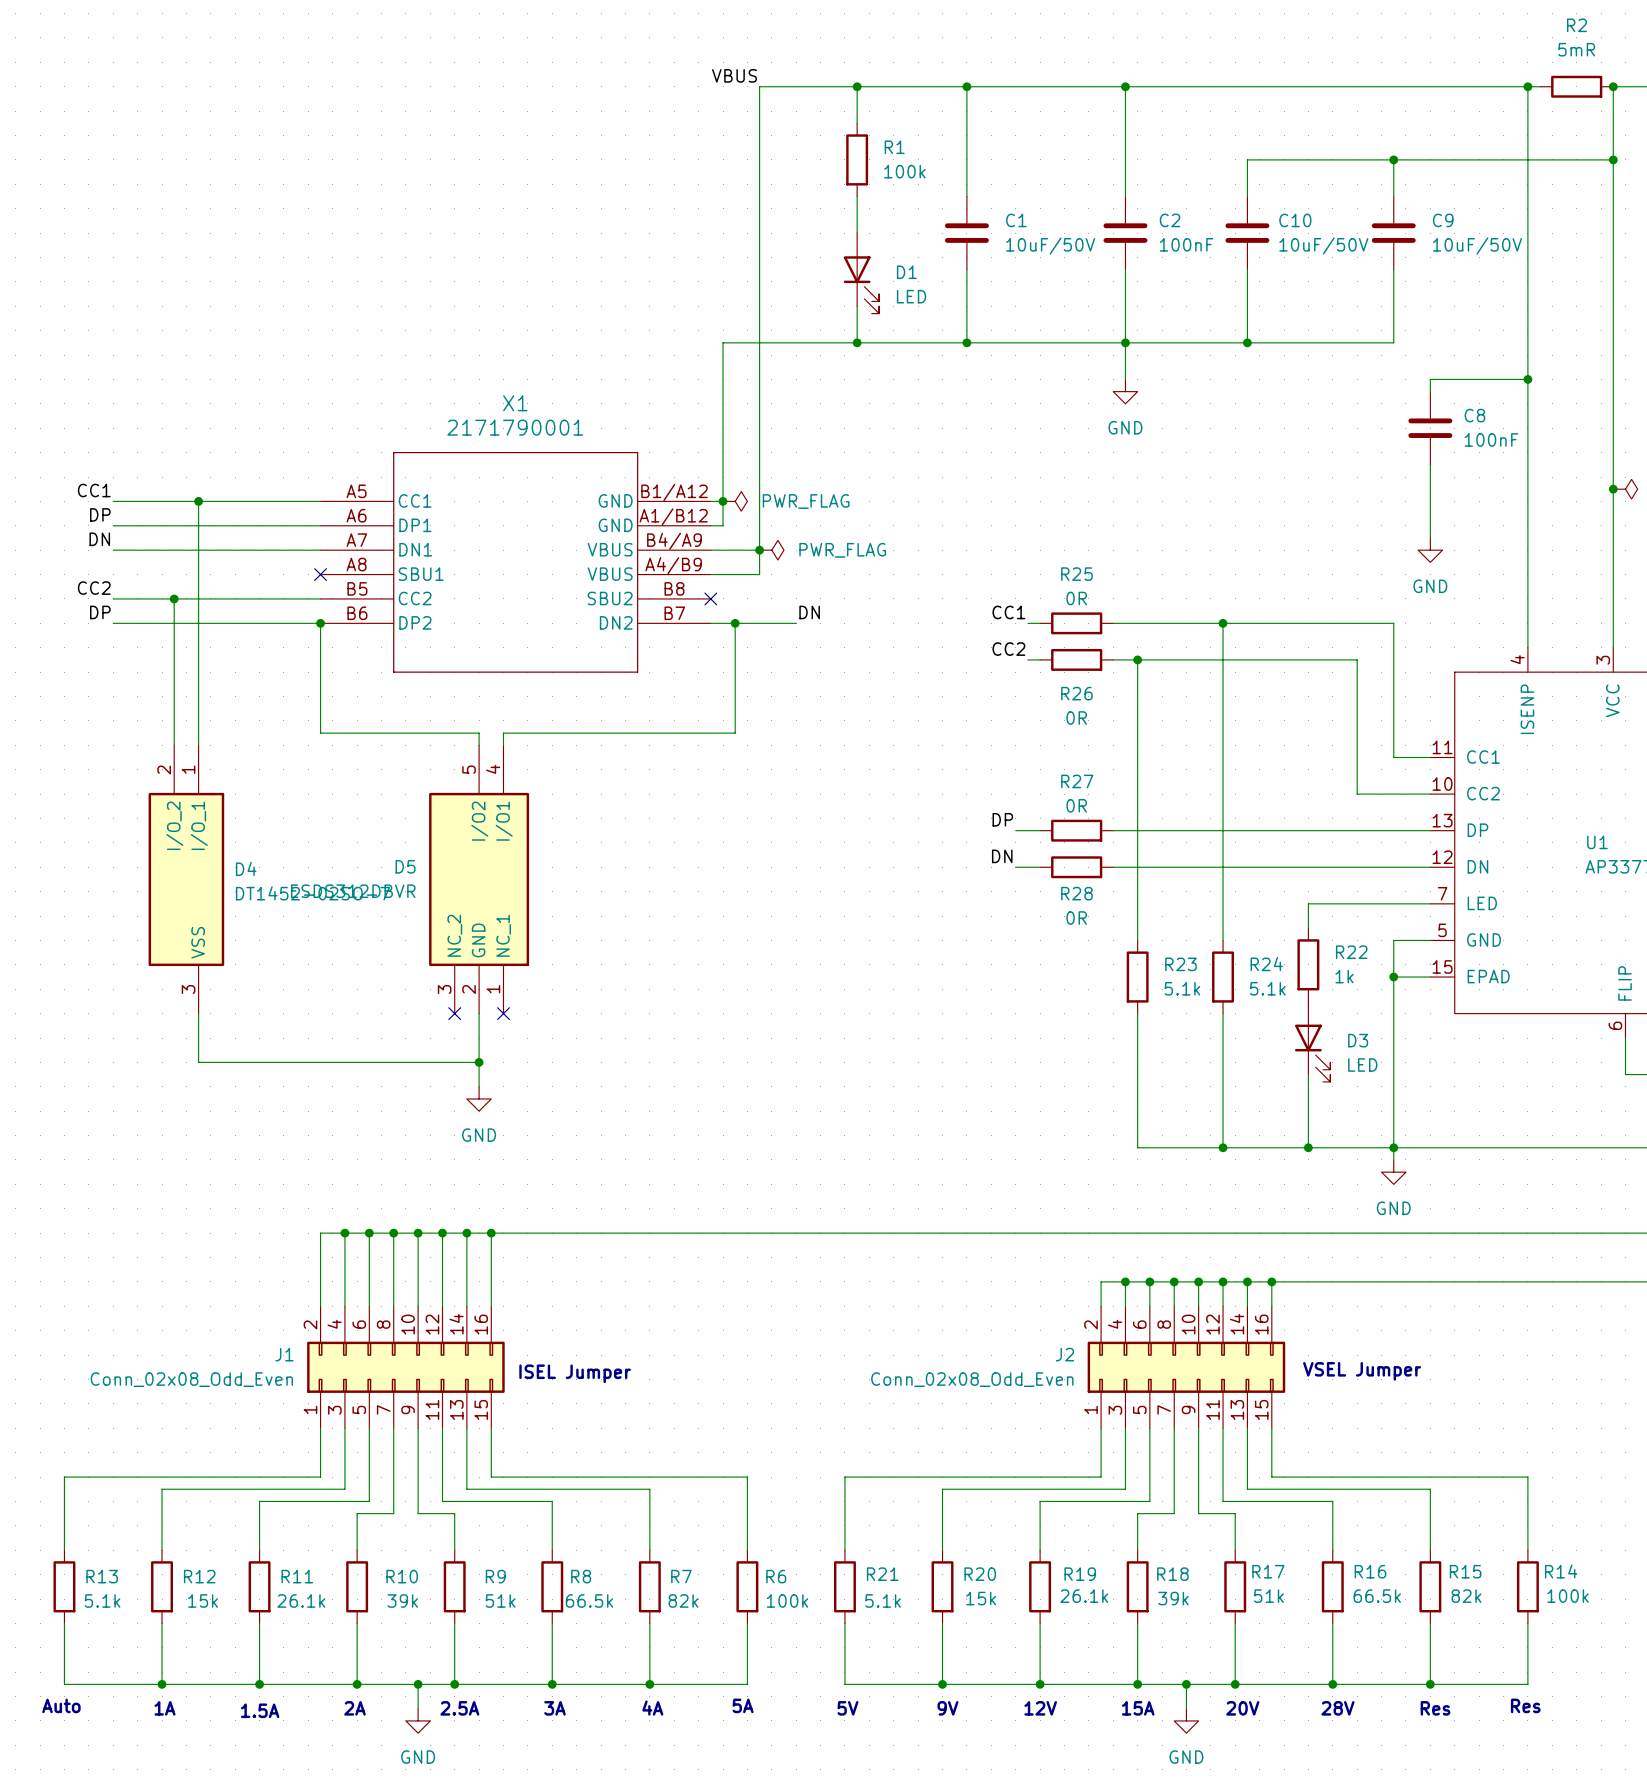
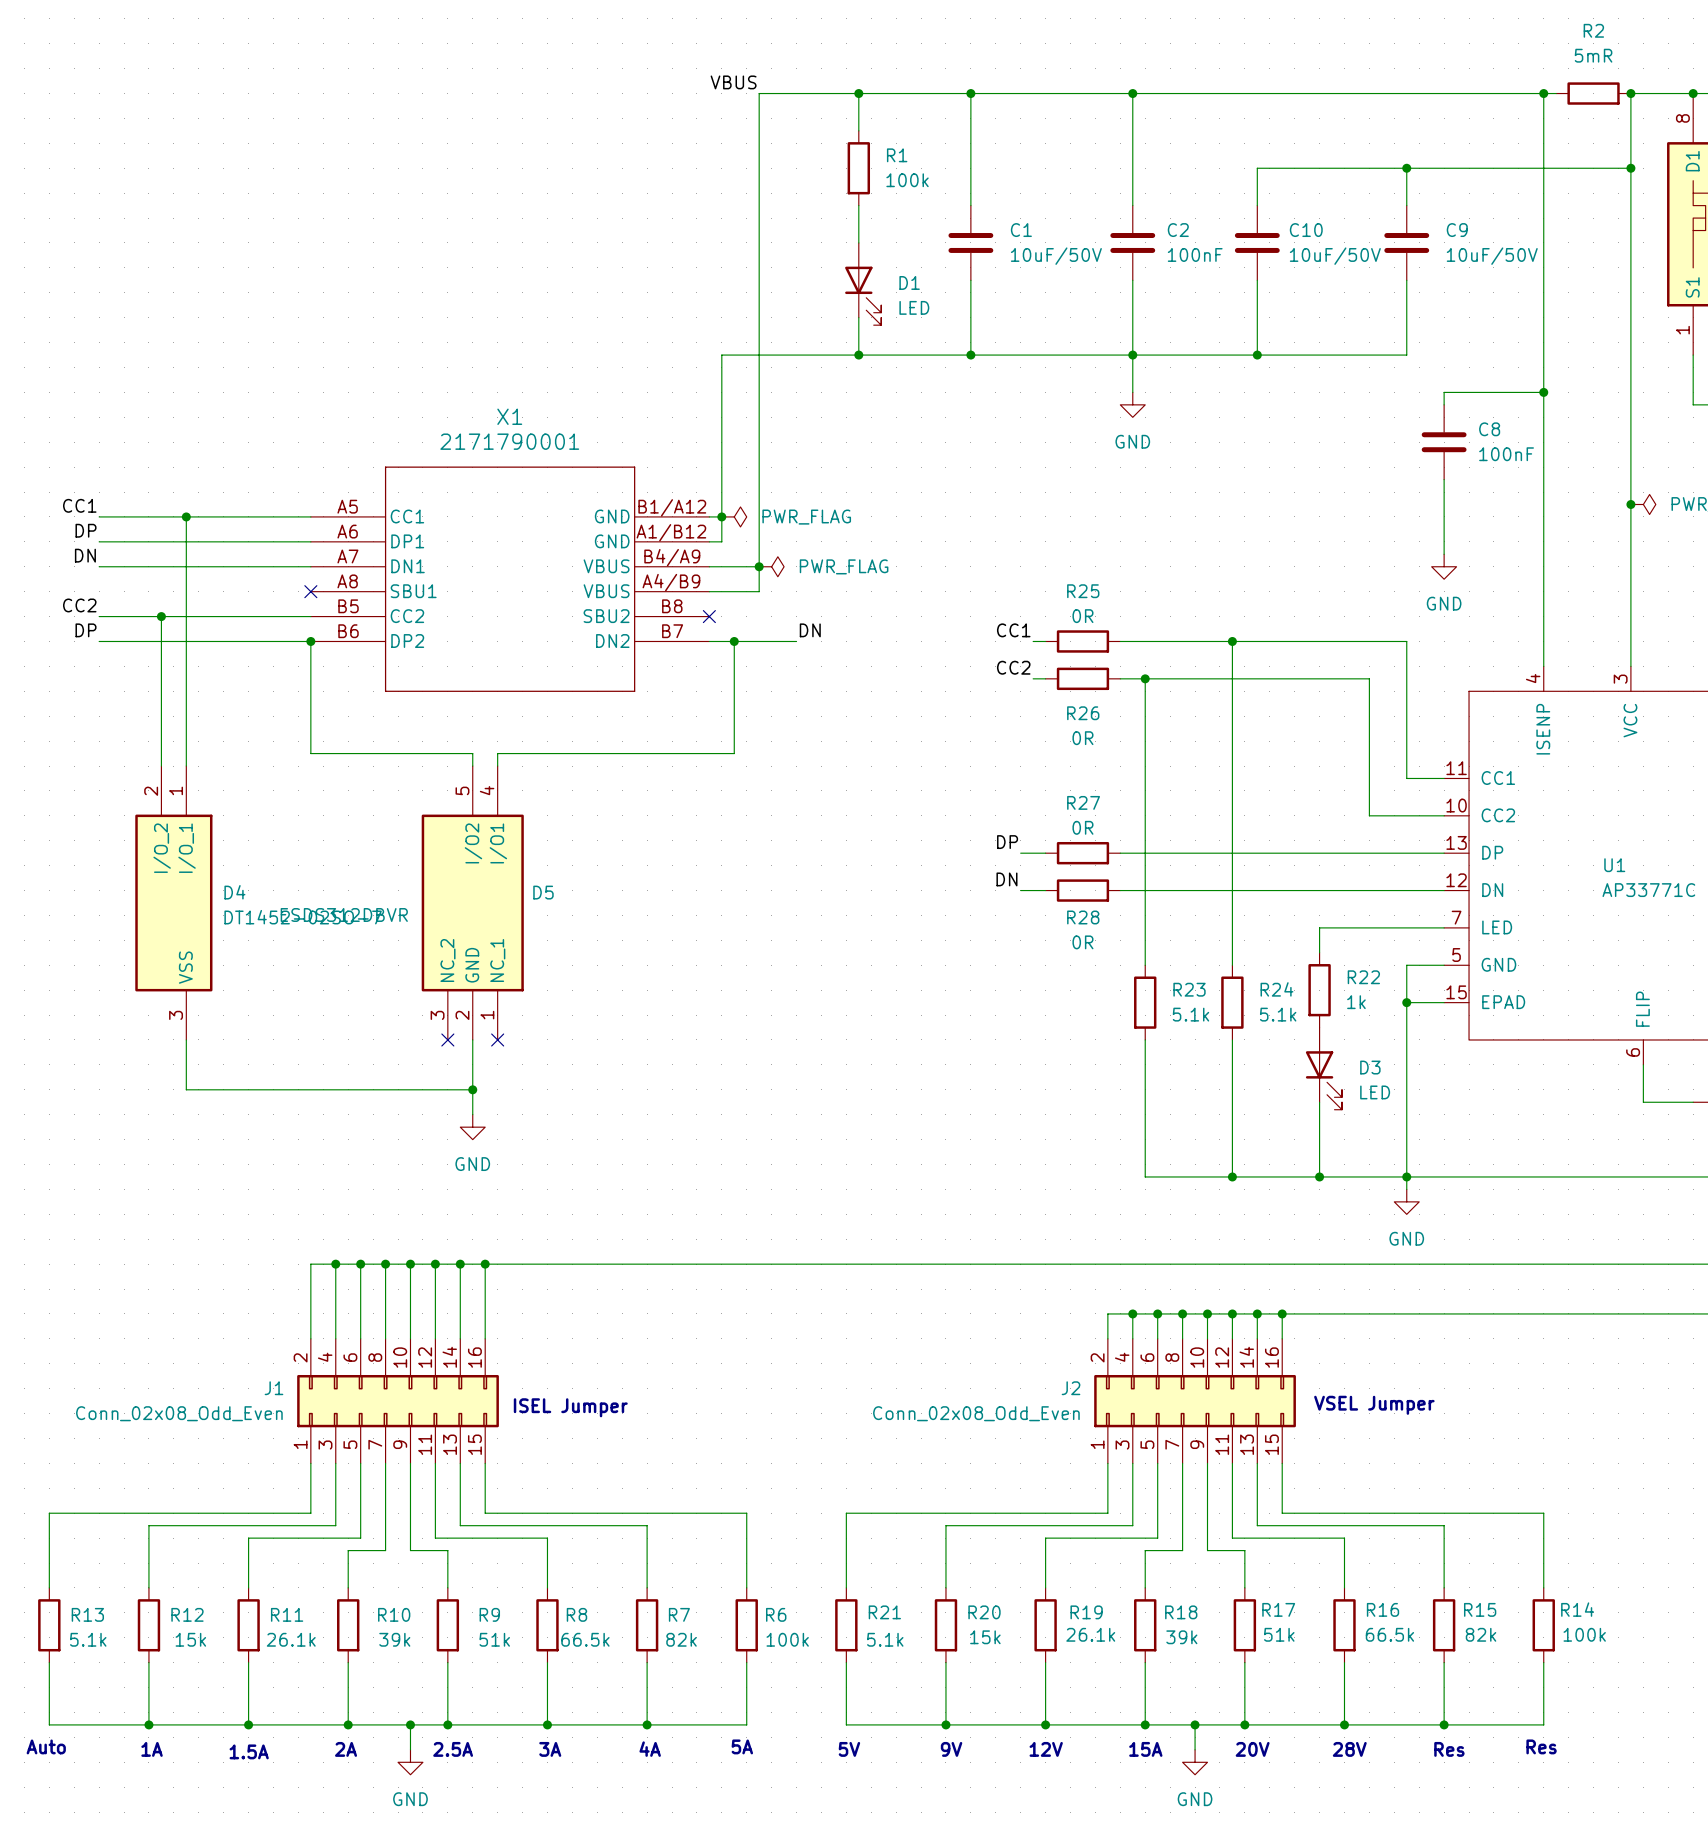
D5 name position: D5 (405, 866) -> D5 (543, 892)

